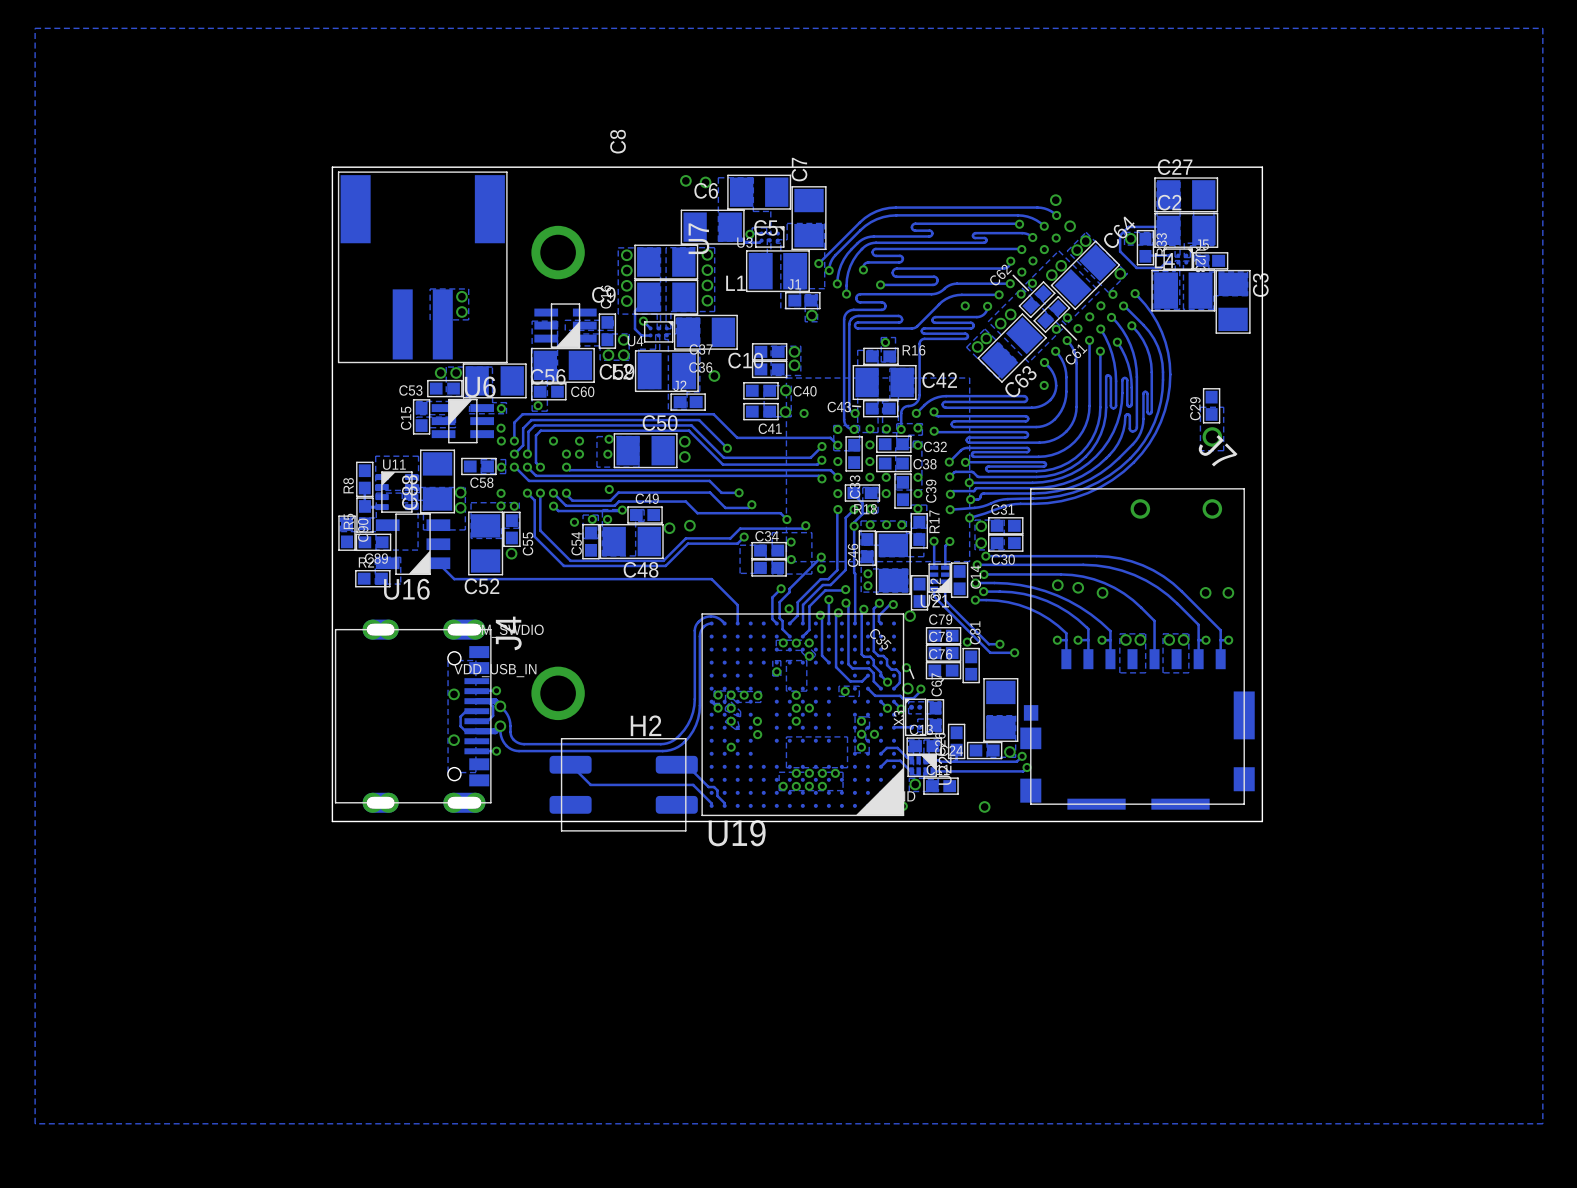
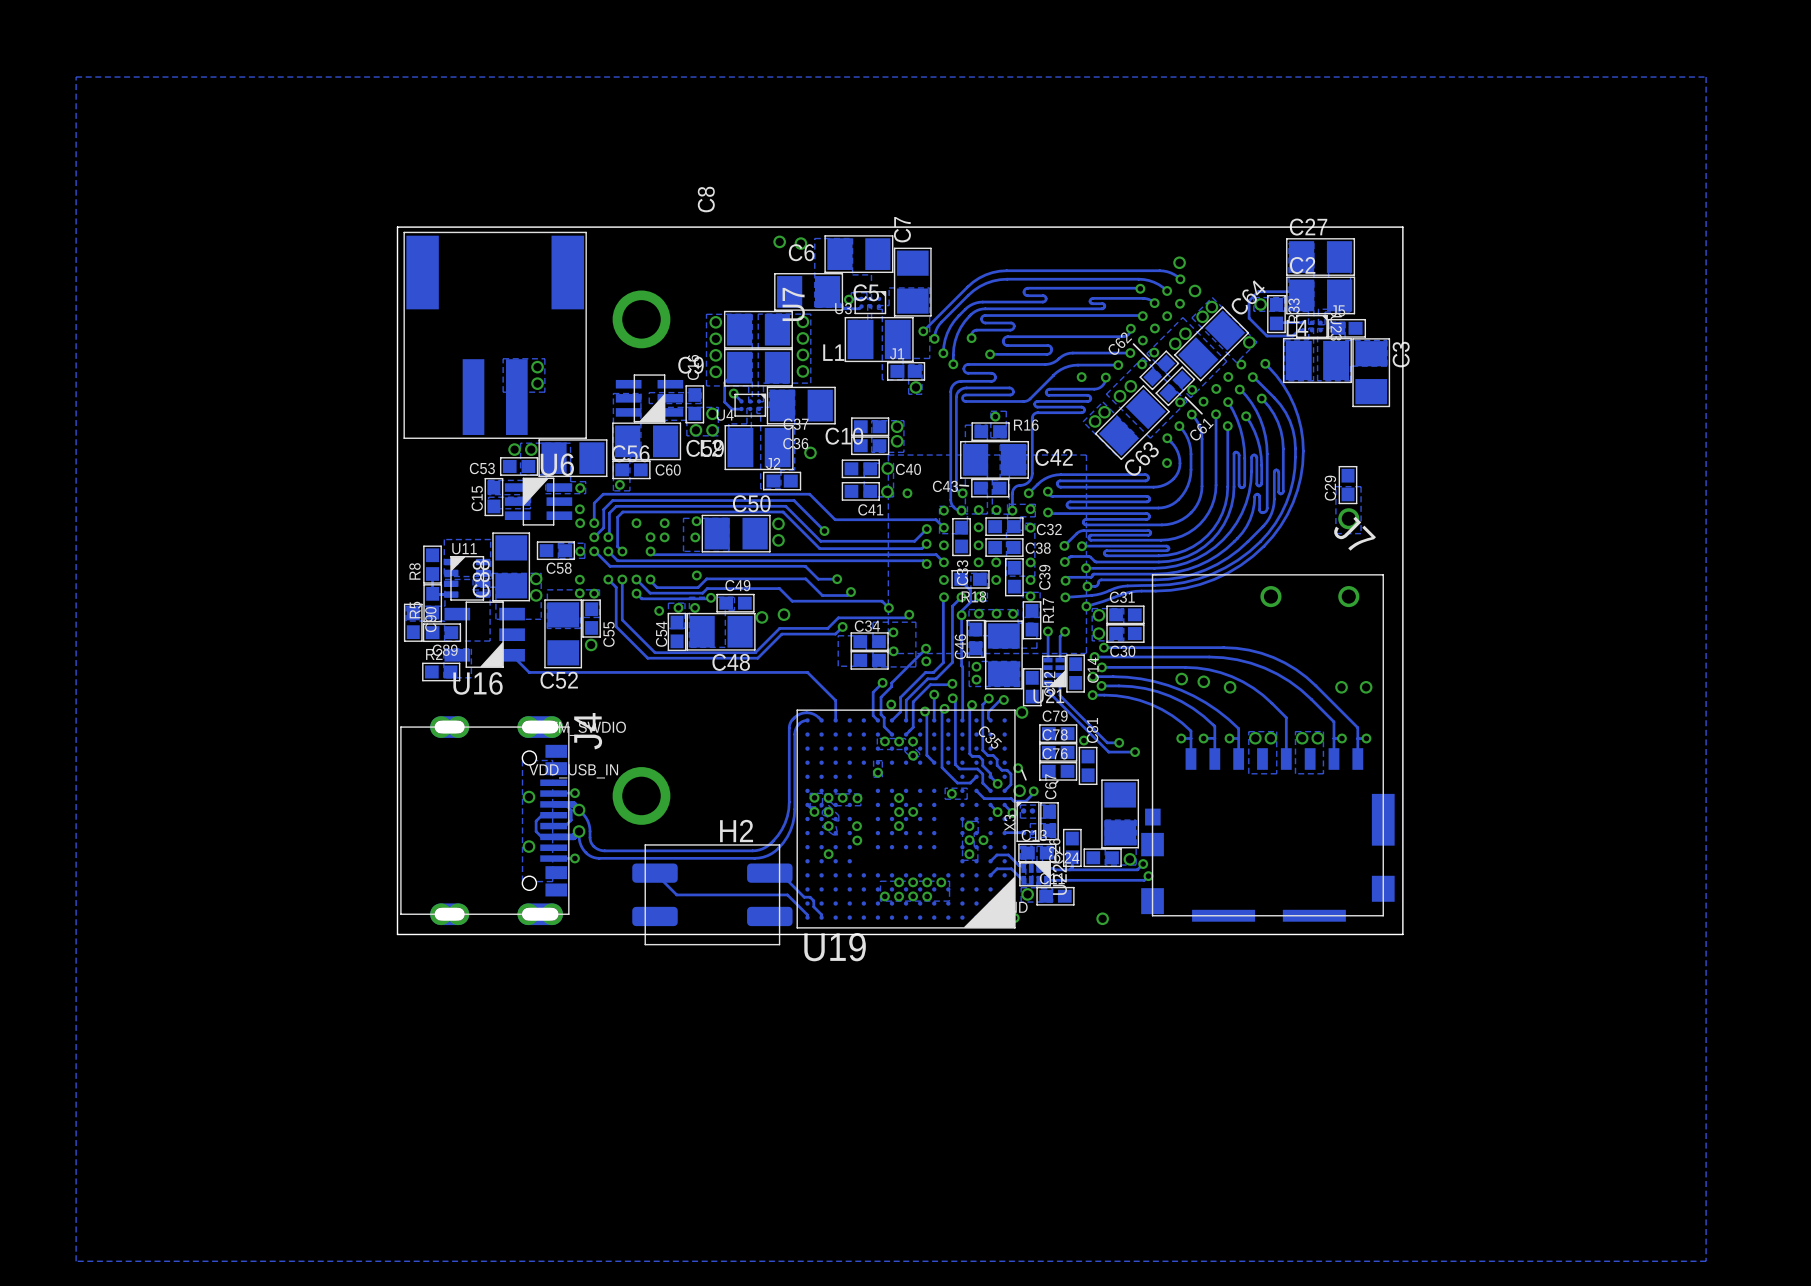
zone outline: (806, 660) (806, 691) (786, 691) (786, 660) (806, 660) -> none
zone outline: (847, 736) (847, 767) (786, 767) (786, 736) (847, 736) -> none

